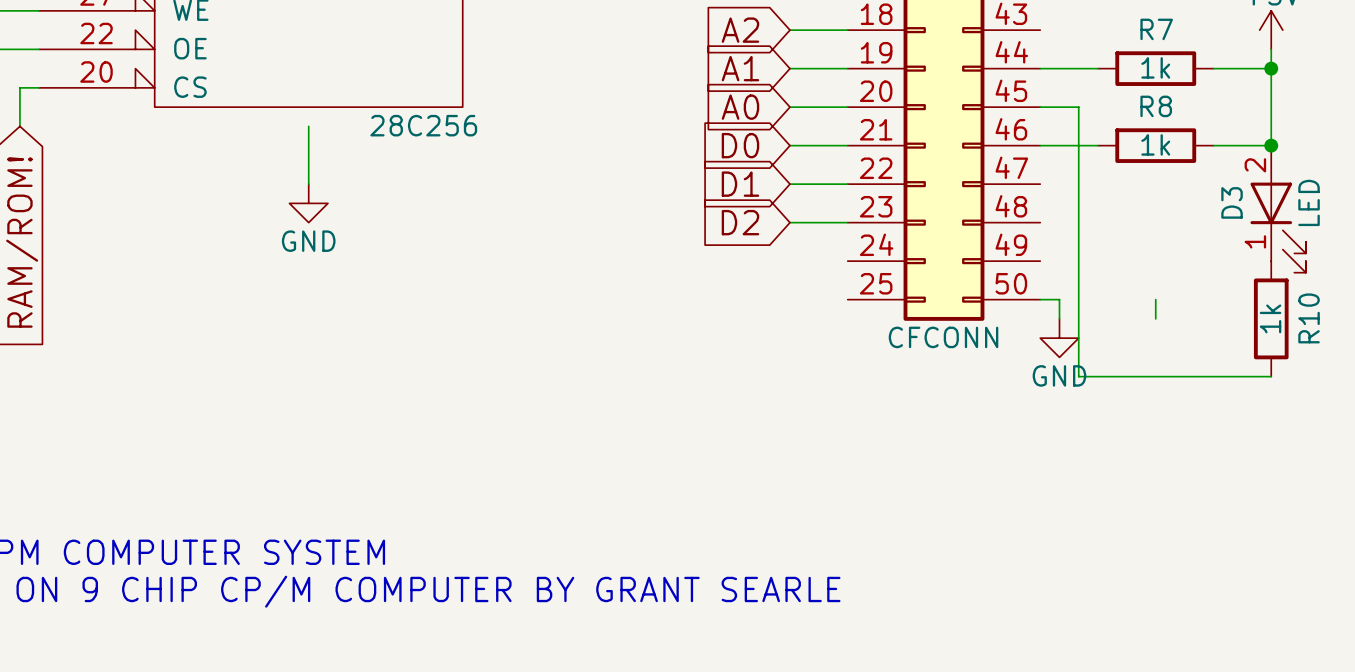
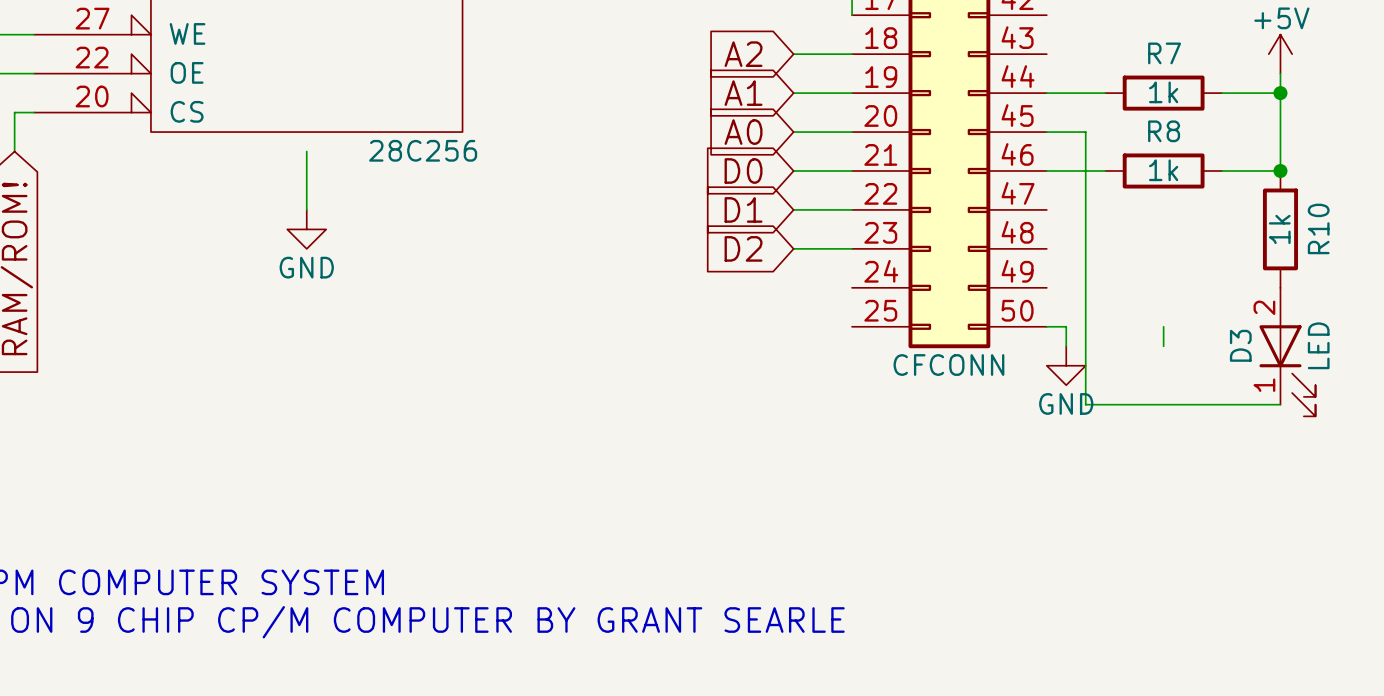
D3 position: (1278, 209) -> (1287, 352)
R10 position: (1271, 318) -> (1280, 229)

